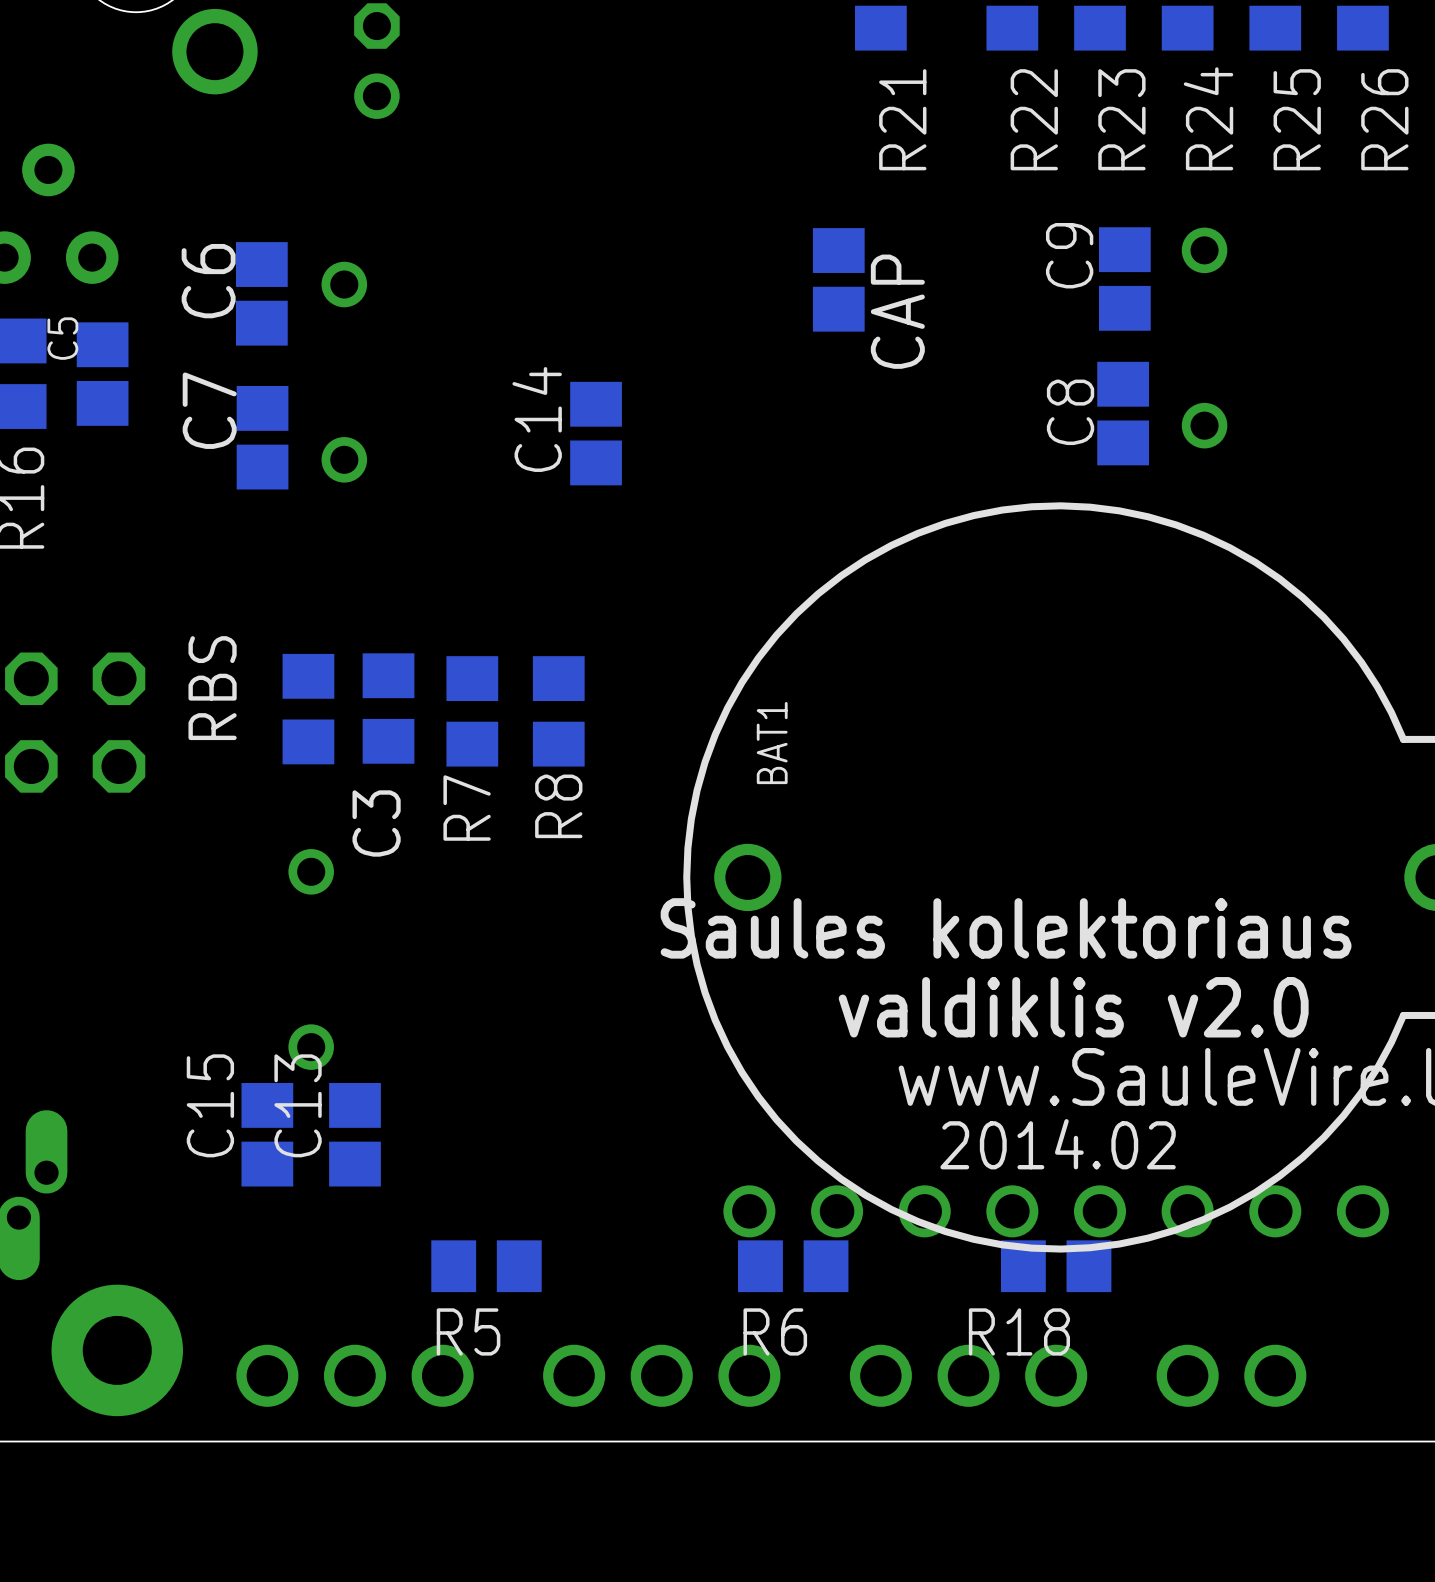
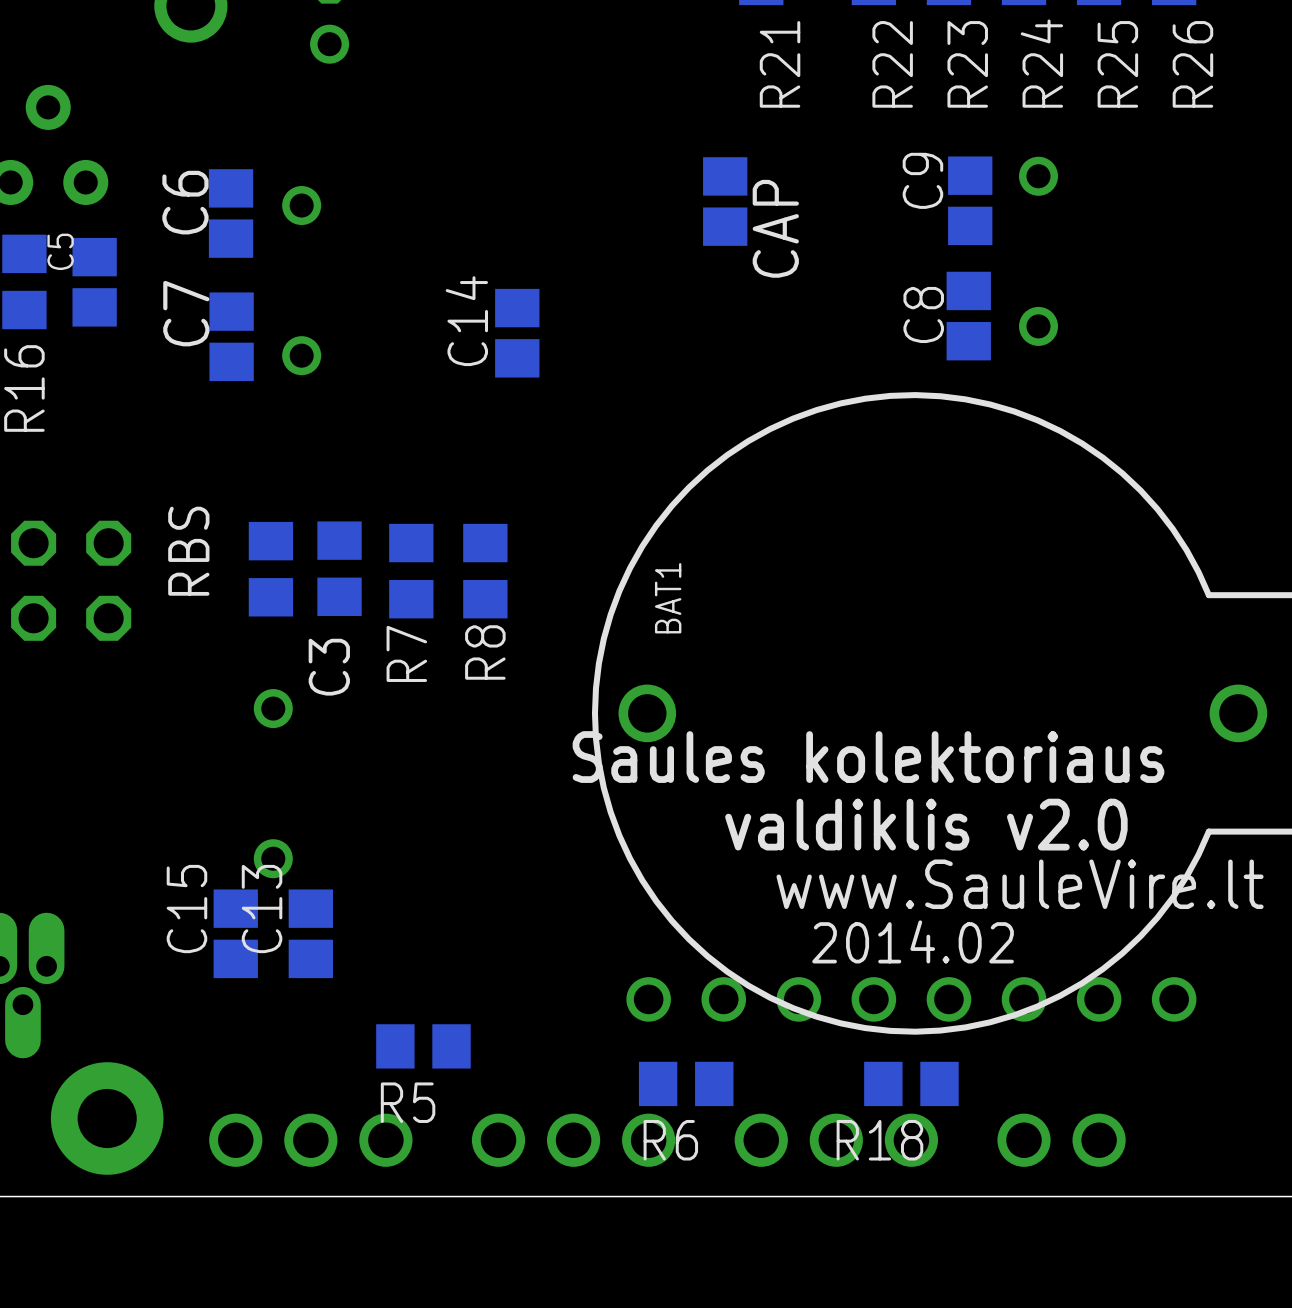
R6 position: (793, 1266) -> (686, 1083)
R18 position: (1056, 1266) -> (911, 1083)

